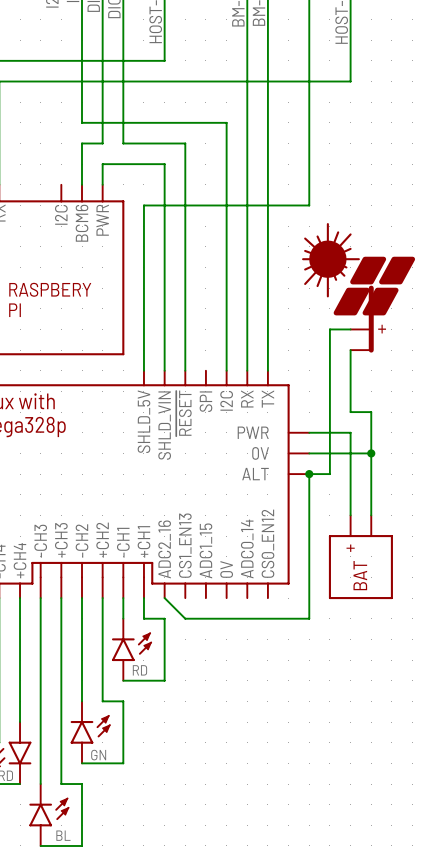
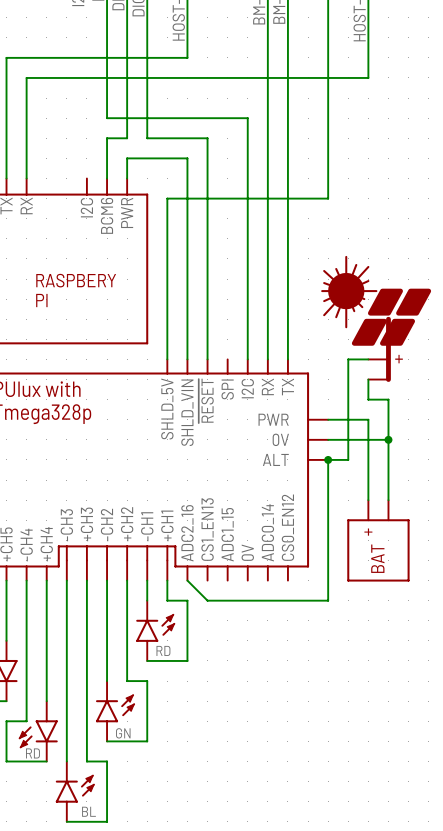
part position: (358, 287) -> (376, 318)
wire: (350, 329) (329, 329) (329, 370) -> (368, 359) (348, 359)
wire: (350, 350) (350, 391) -> none

